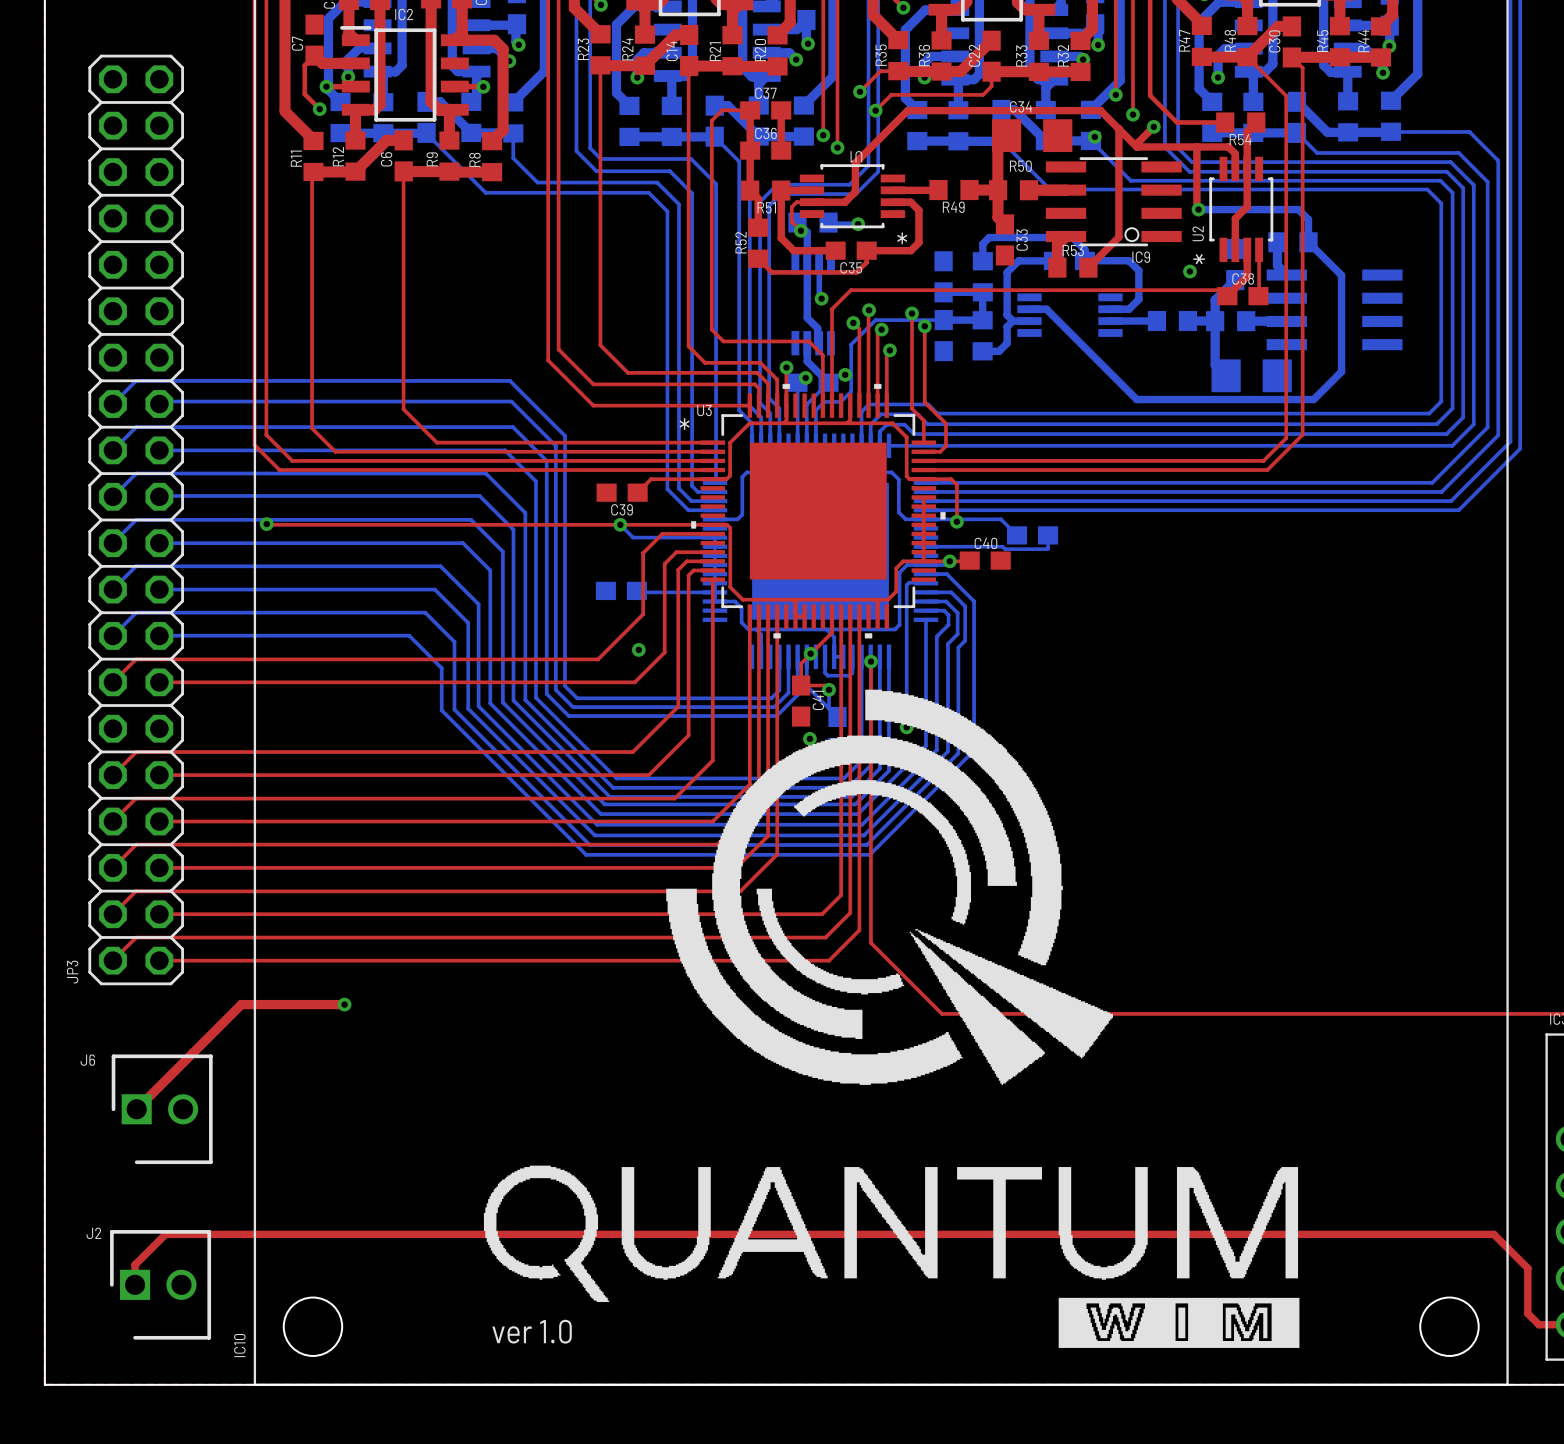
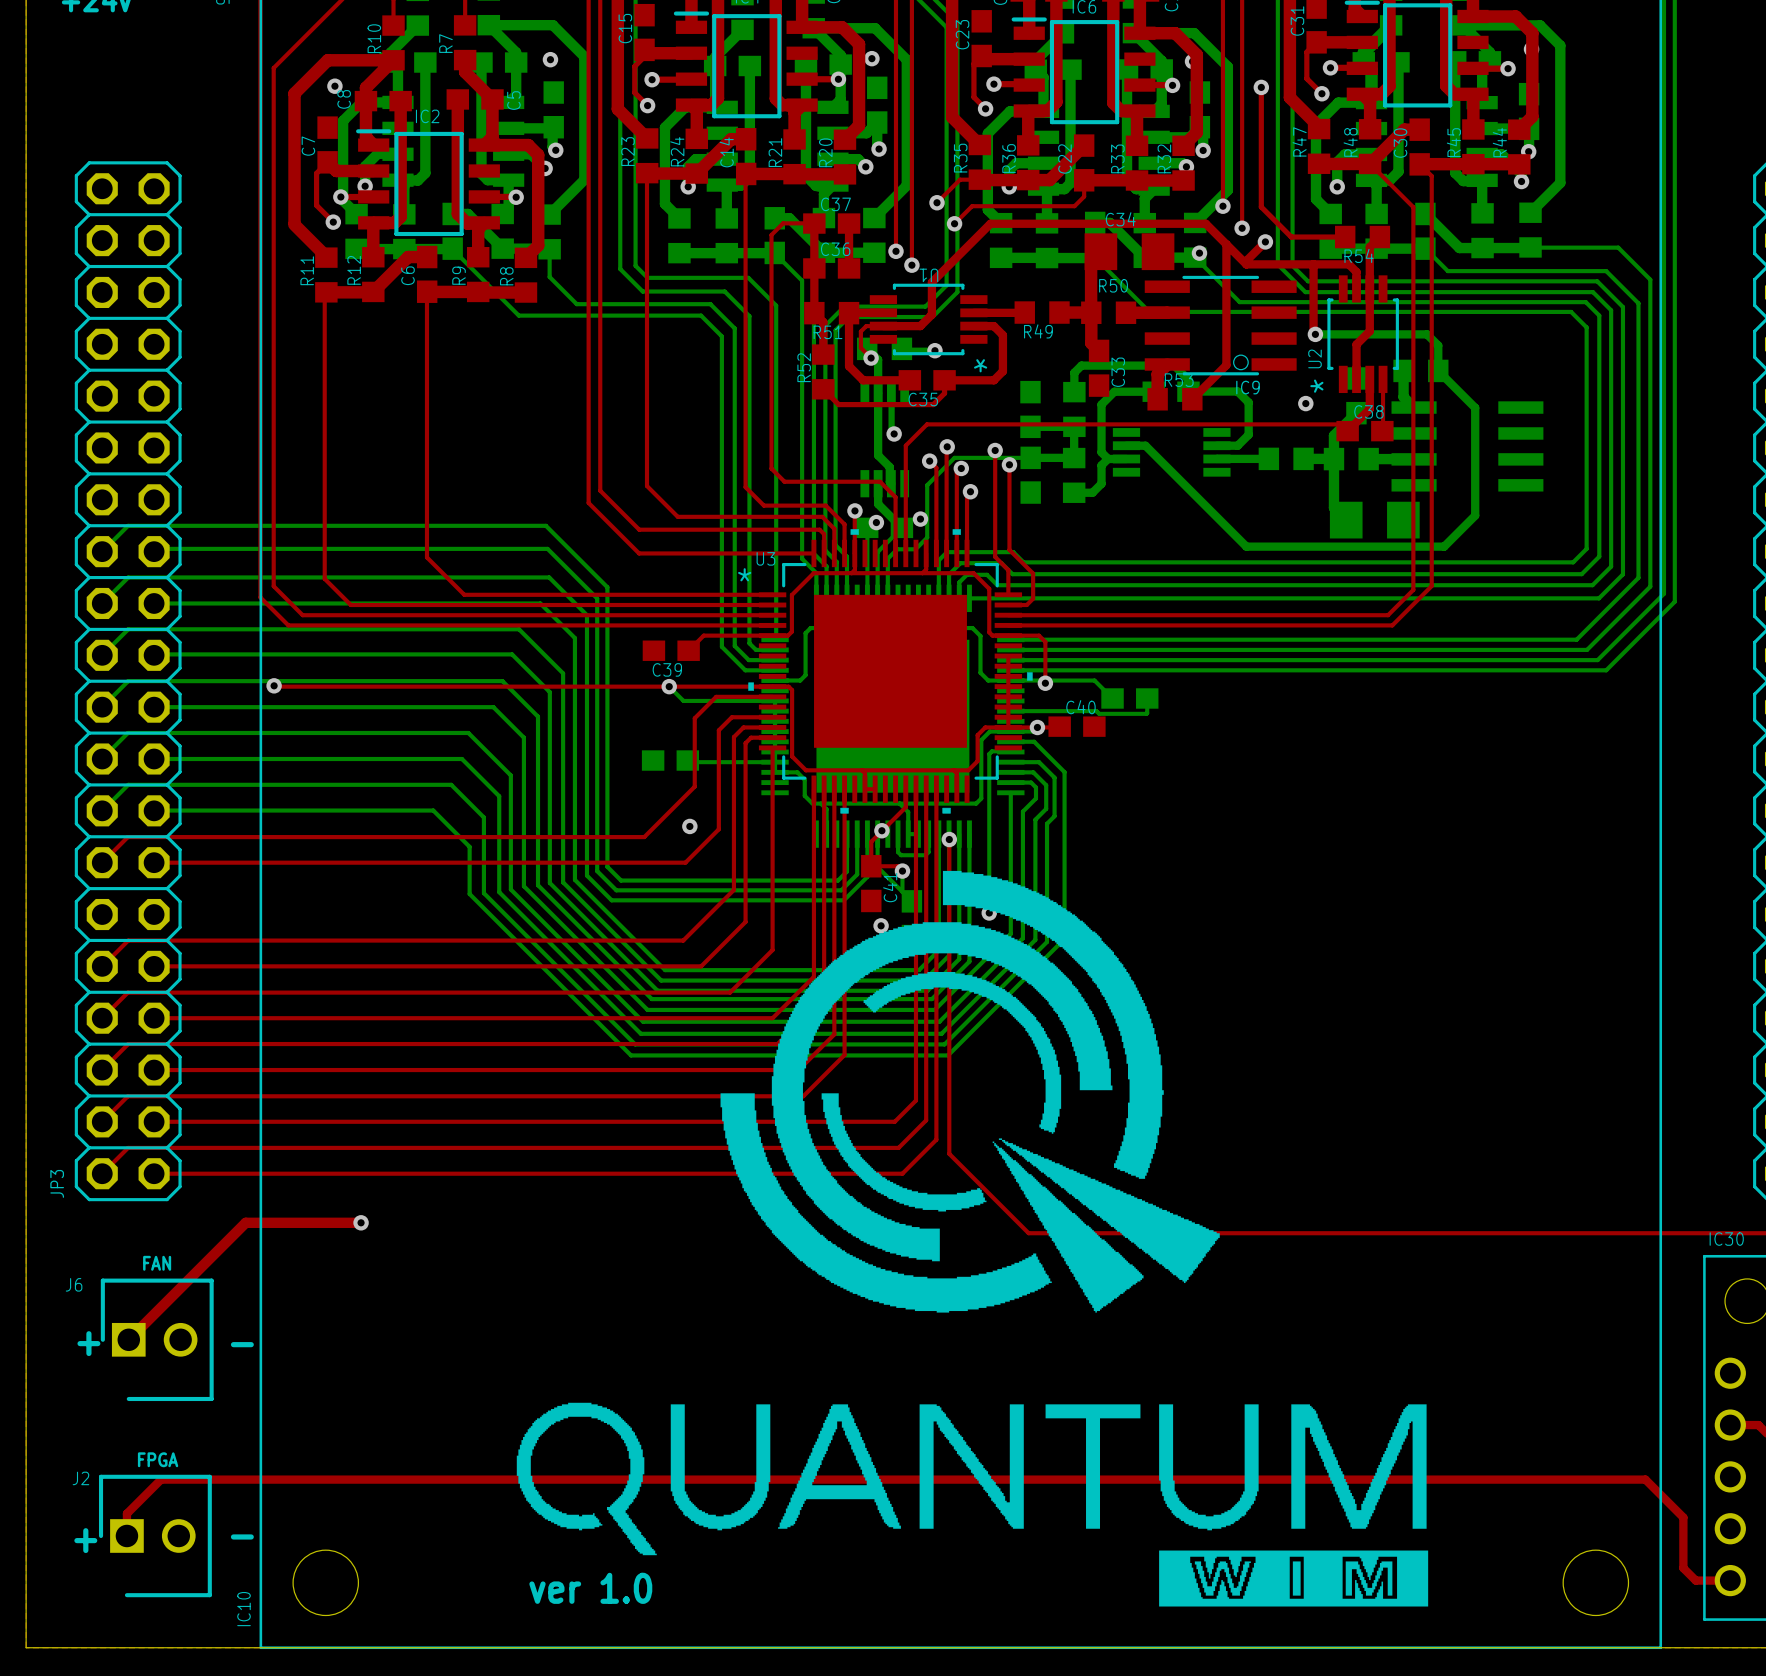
text: none -> FAN (157, 1263)
text: none -> + (88, 1343)
text: none -> - (242, 1344)
text: none -> FPGA (158, 1459)
text: none -> - (242, 1536)
text: none -> + (85, 1540)

